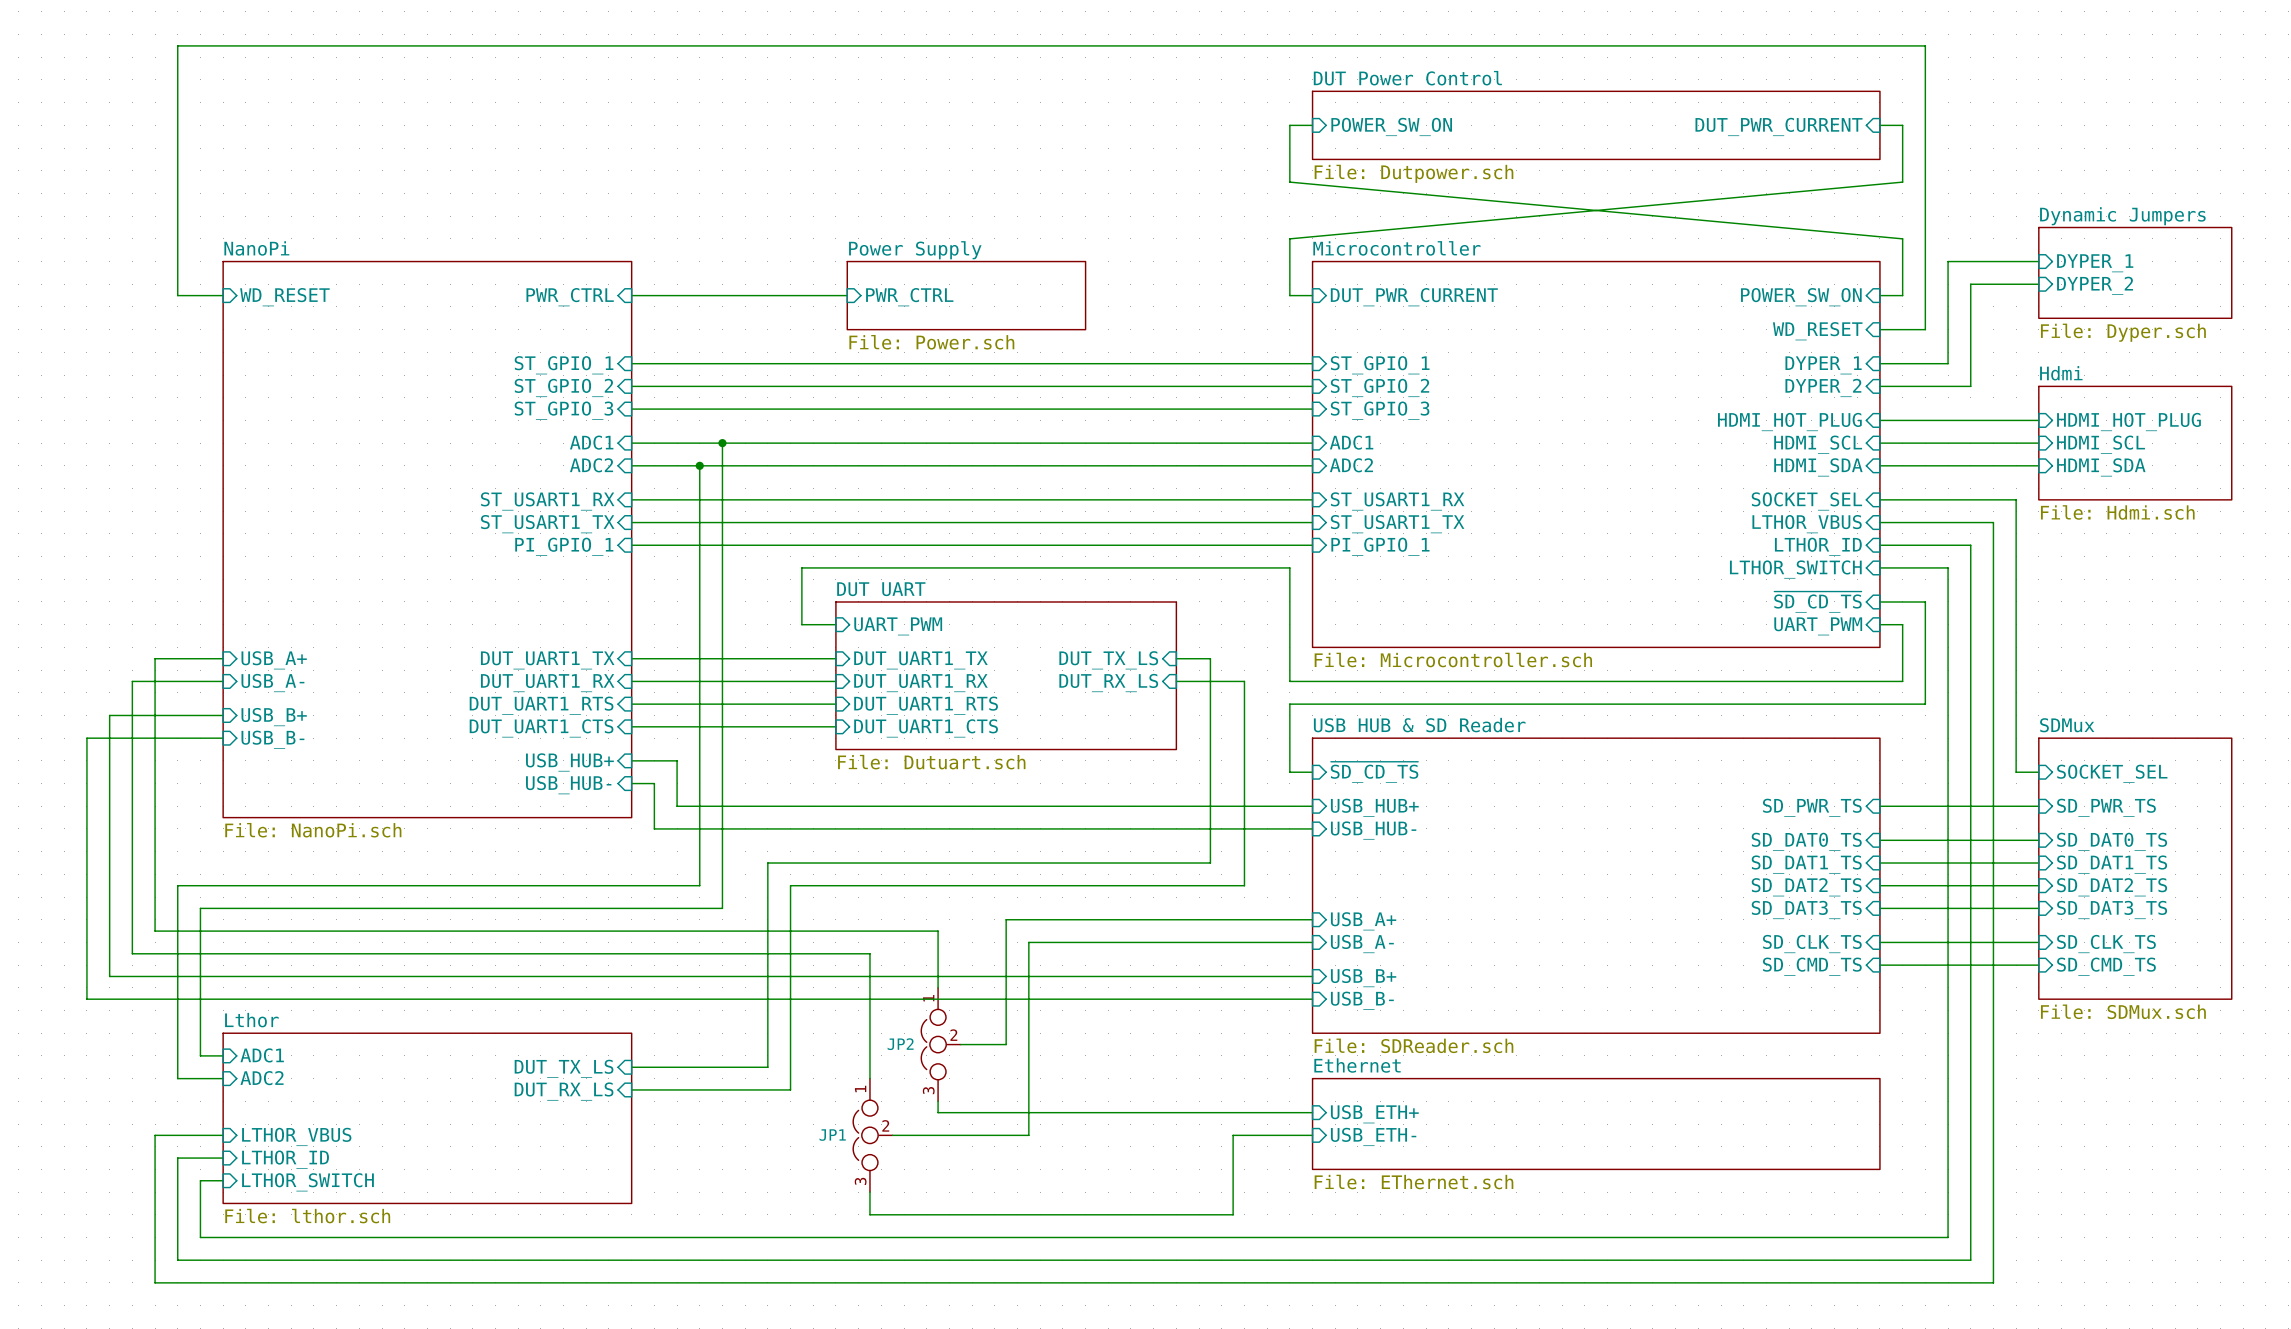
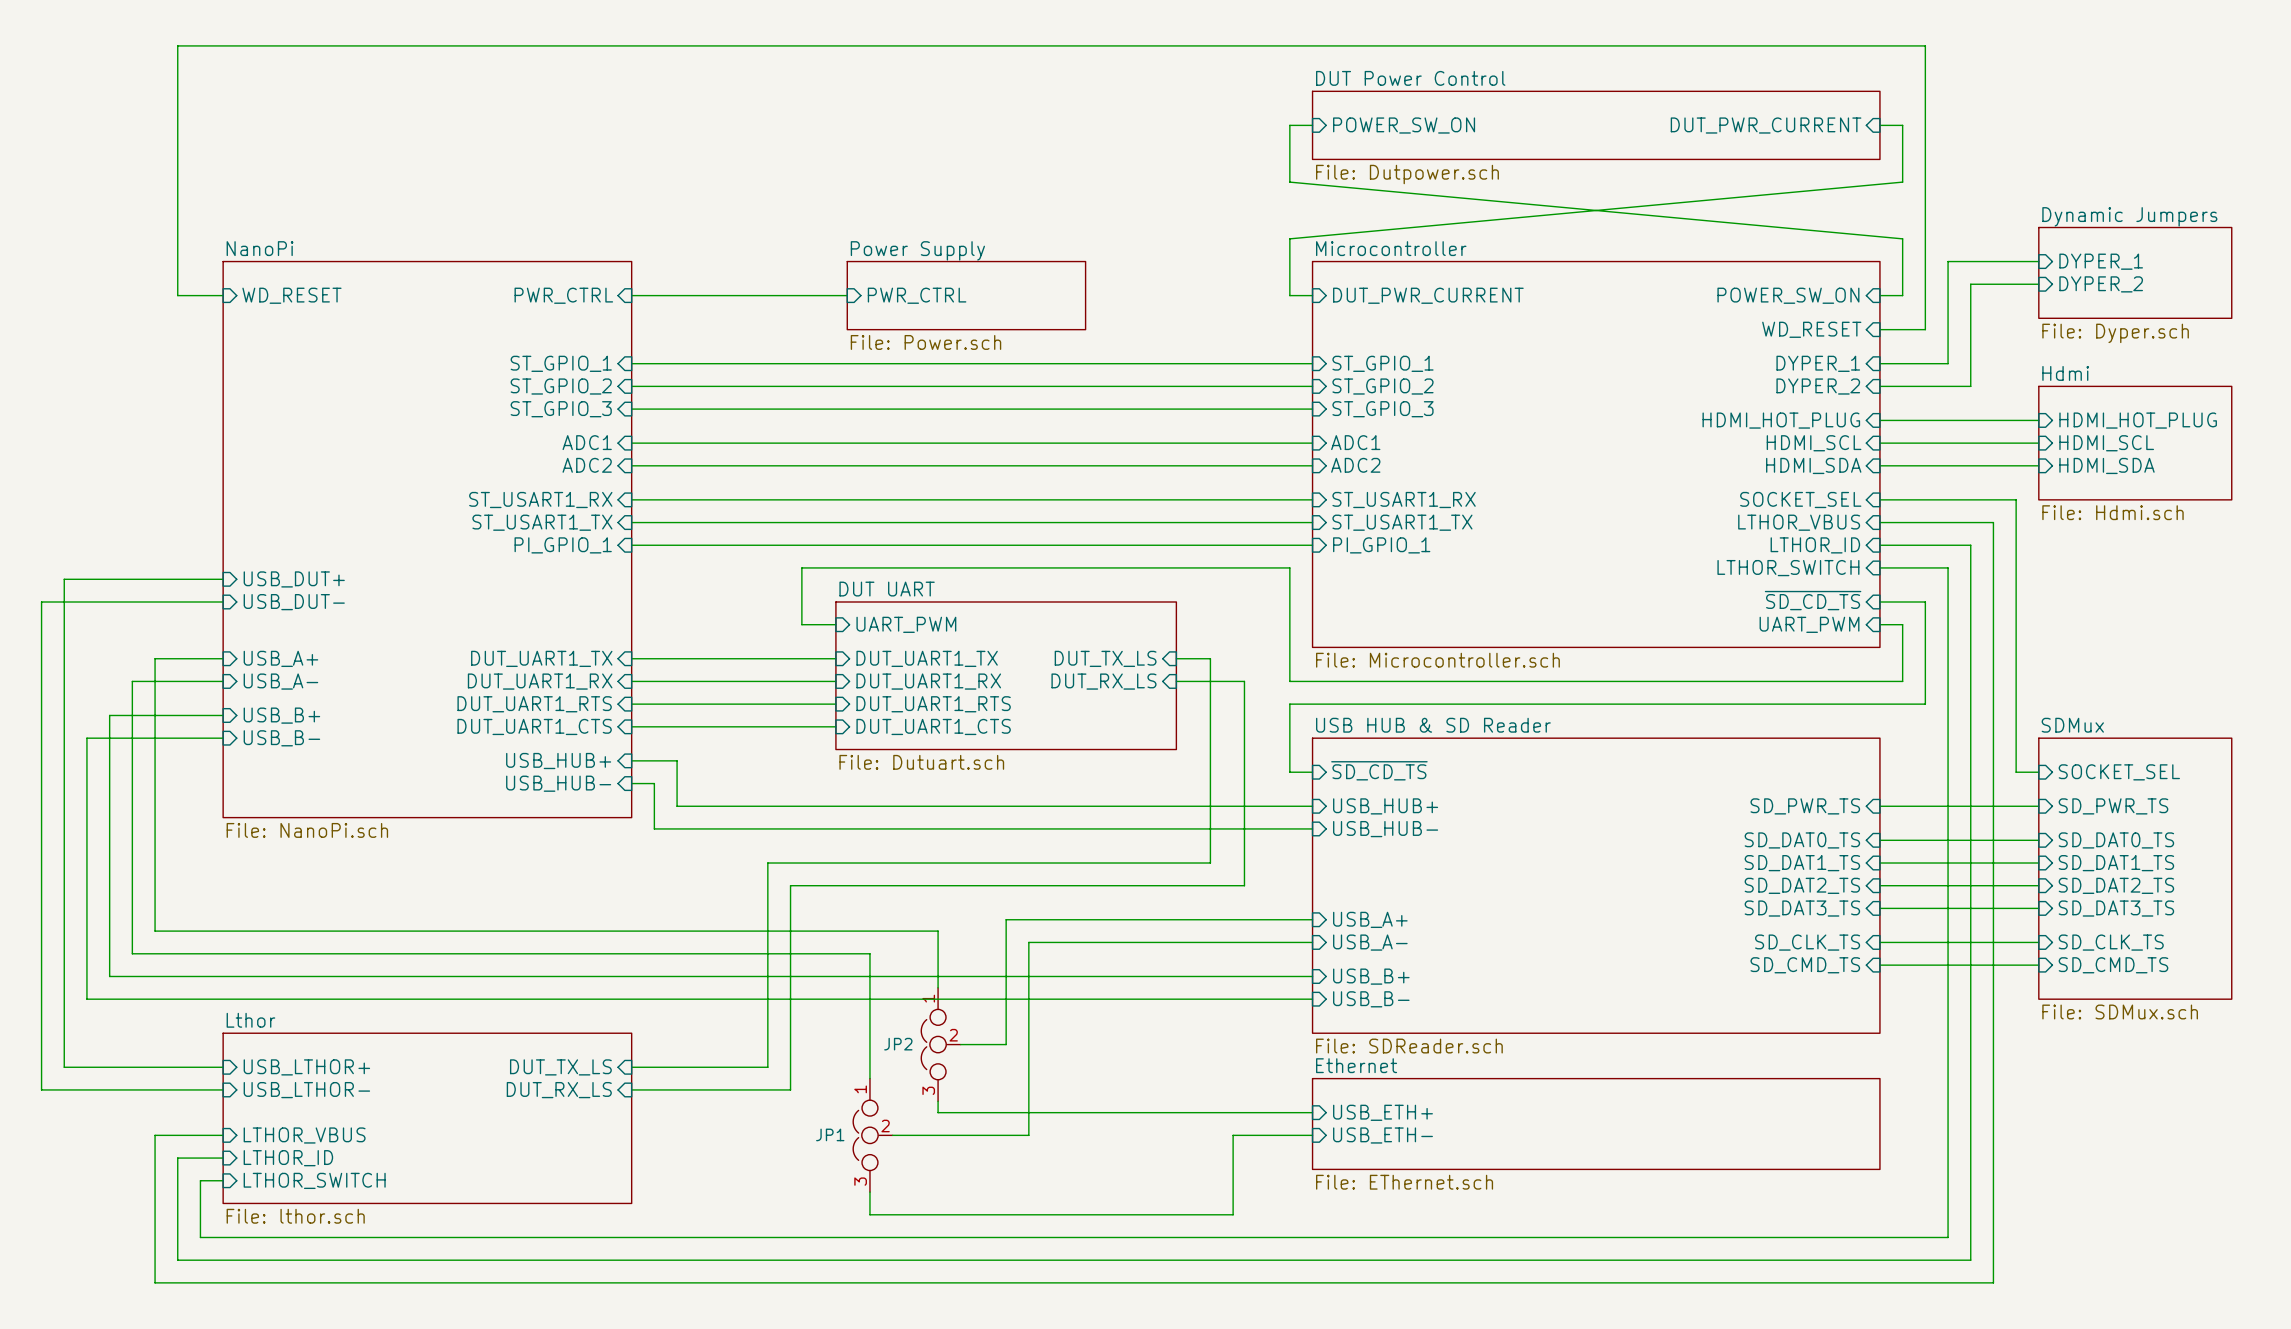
wire: (722, 443) (722, 908) (200, 908) (200, 1055) (223, 1055) -> none
junction: (722, 443) -> none
wire: (699, 465) (699, 885) (177, 885) (177, 1078) (223, 1078) -> none
junction: (699, 465) -> none
wire: none -> (223, 579) (64, 579) (64, 1067) (223, 1067)
sheet pin: none -> USB_DUT+ (294, 579)
wire: none -> (223, 601) (41, 601) (41, 1089) (223, 1089)
sheet pin: none -> USB_DUT- (294, 602)
sheet pin: ADC1 (262, 1055) -> none
sheet pin: none -> USB_LTHOR+ (306, 1067)
sheet pin: ADC2 (262, 1078) -> none
sheet pin: none -> USB_LTHOR- (306, 1090)

